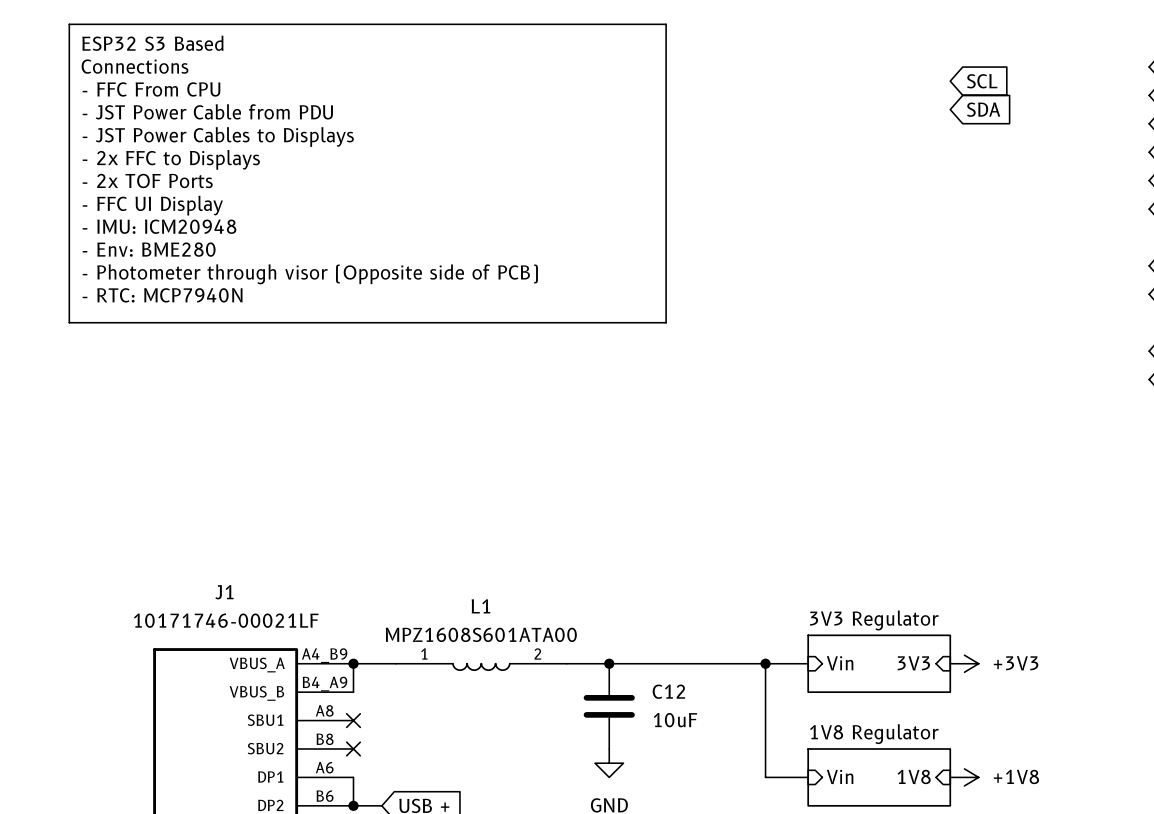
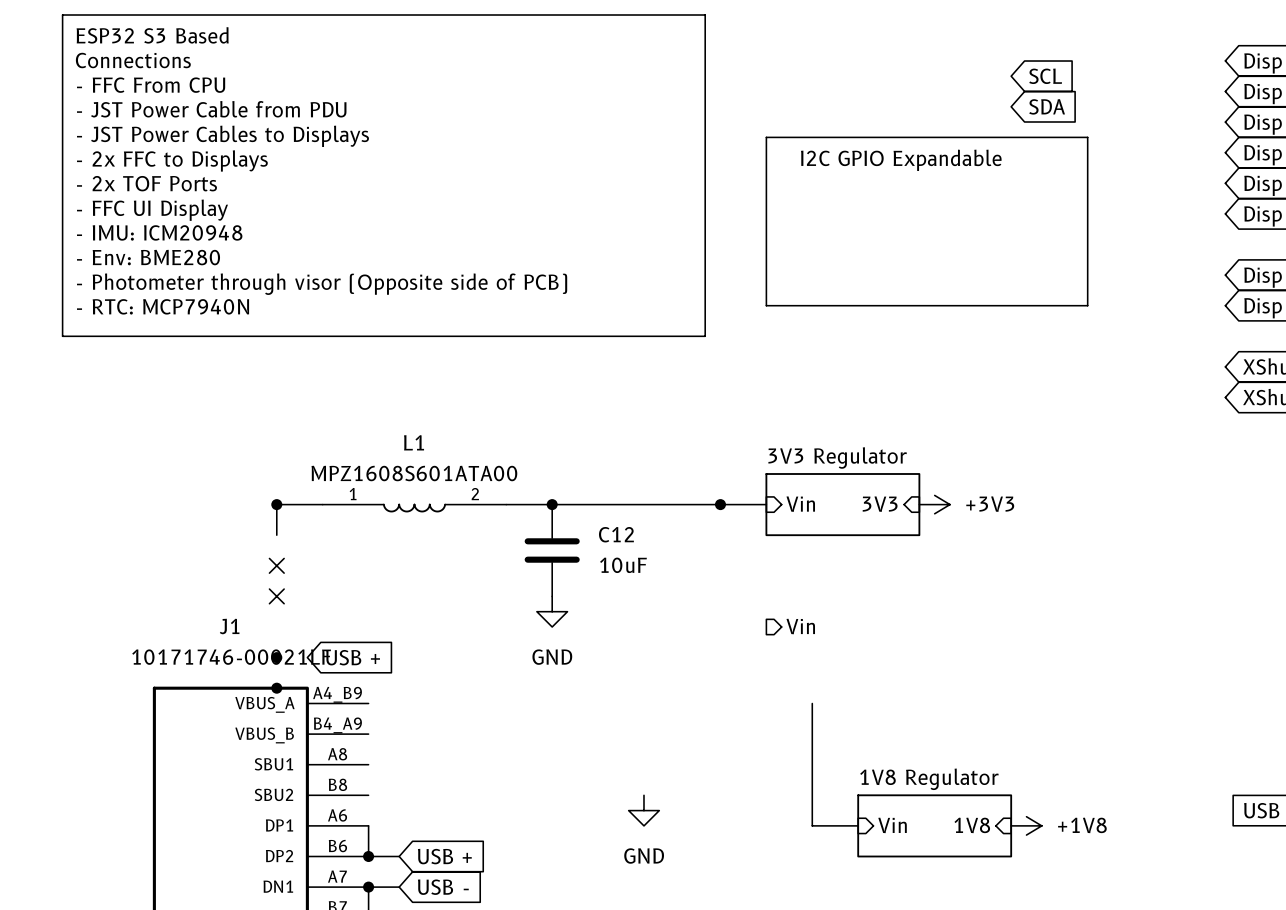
line: none -> (766, 137) (1087, 137) (1087, 305) (766, 305) (766, 137)
text: none -> I2C GPIO Expandable (901, 160)
sheet pin: none -> Vin (800, 504)
junction: none -> (276, 504)
junction: none -> (552, 504)
junction: none -> (720, 504)
no-connect mark: none -> (276, 565)
no-connect mark: none -> (276, 596)
power symbol: none -> GND (552, 611)
sheet pin: none -> Vin (800, 626)
junction: none -> (276, 657)
global label: none -> USB + (353, 657)
junction: none -> (276, 688)
junction: (353, 663) -> none
wire: (396, 663) (353, 663) (353, 692) -> (322, 504) (276, 504) (276, 535)
wire: (566, 663) (808, 663) -> (506, 504) (766, 504)
junction: (609, 663) -> none
junction: (765, 663) -> none
sheet pin: Vin (840, 663) -> none
sheet 3V3 Regulator position: (879, 663) -> (842, 504)
sheet pin position: 3V3 (913, 663) -> 3V3 (880, 504)
power symbol position: +3V3 (964, 663) -> +3V3 (934, 504)
L1 position: (481, 666) -> (414, 508)
C12 position: (609, 706) -> (552, 550)
no-connect mark: (353, 720) -> none
no-connect mark: (353, 748) -> none

